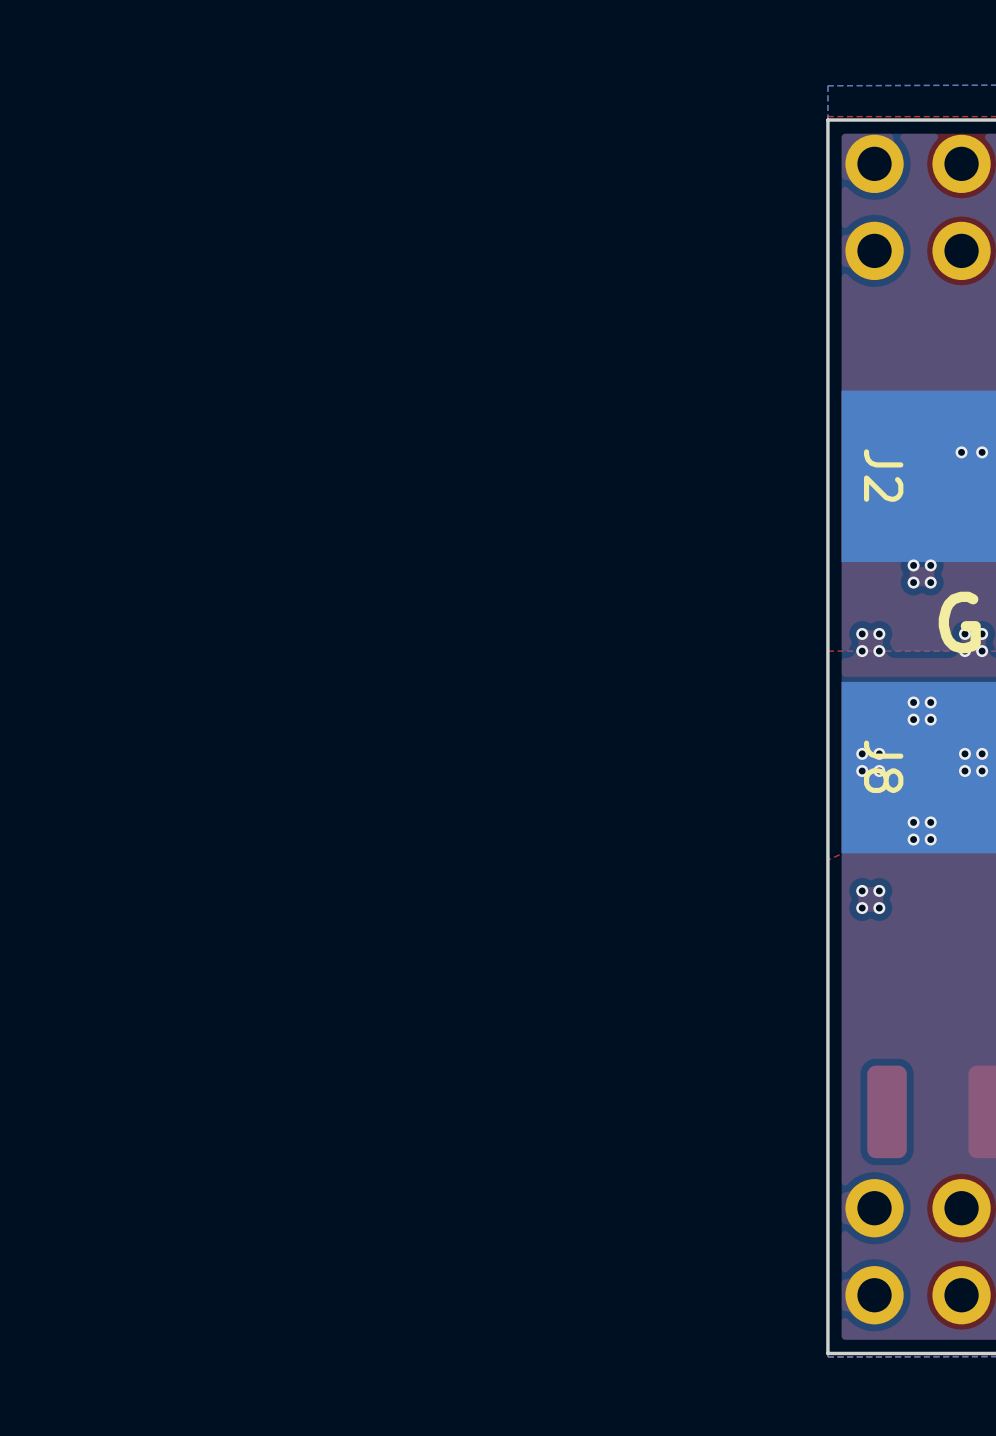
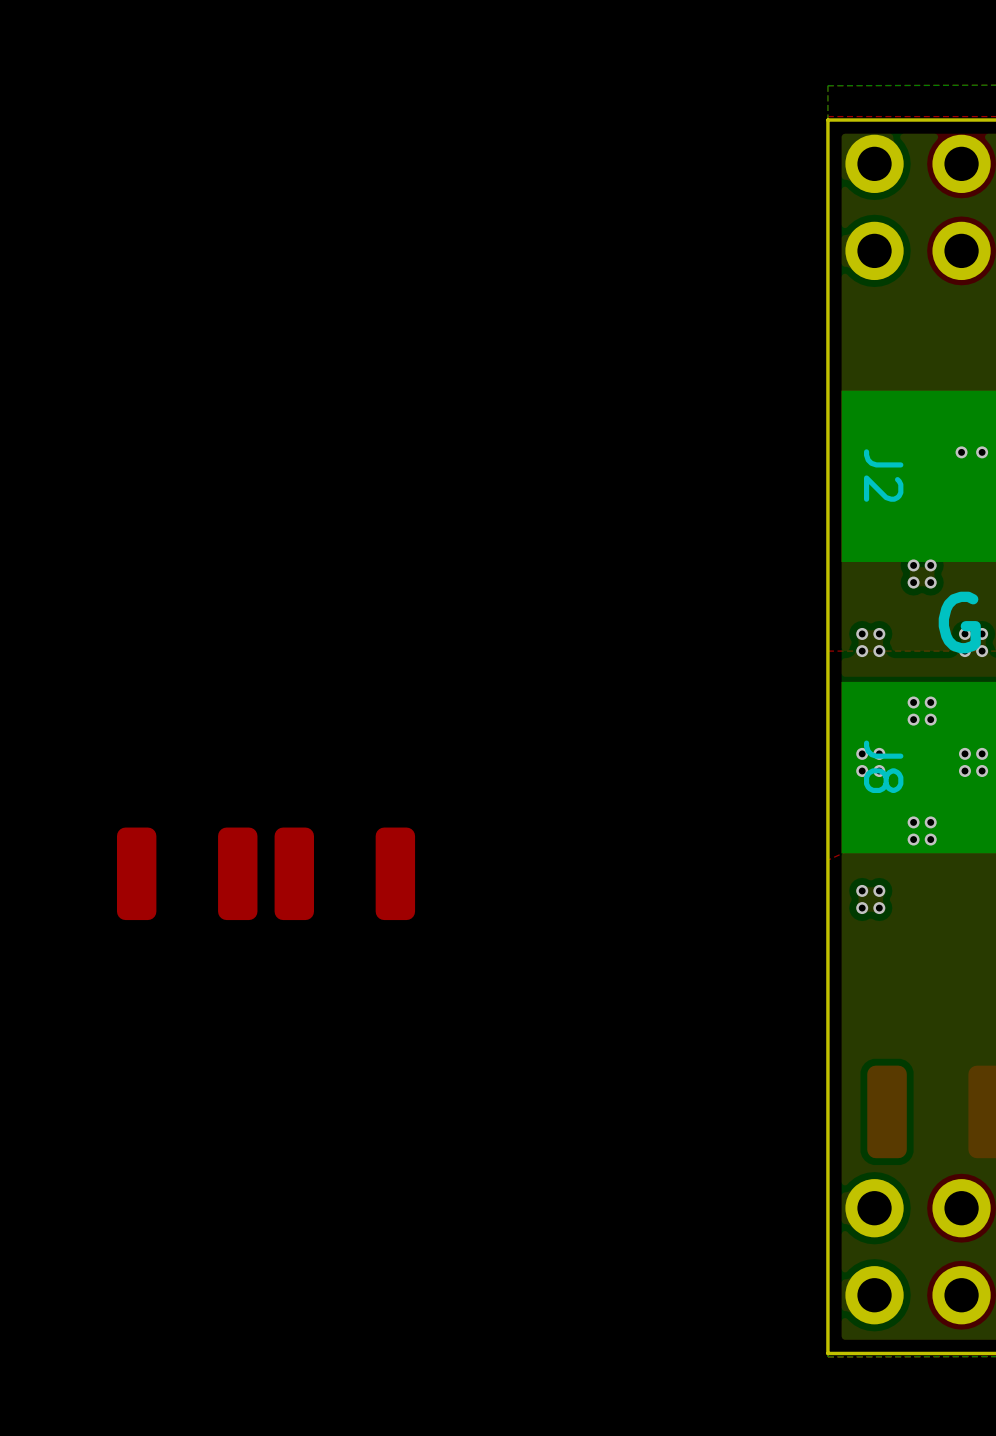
part: none -> (187, 873)
part: none -> (344, 873)

